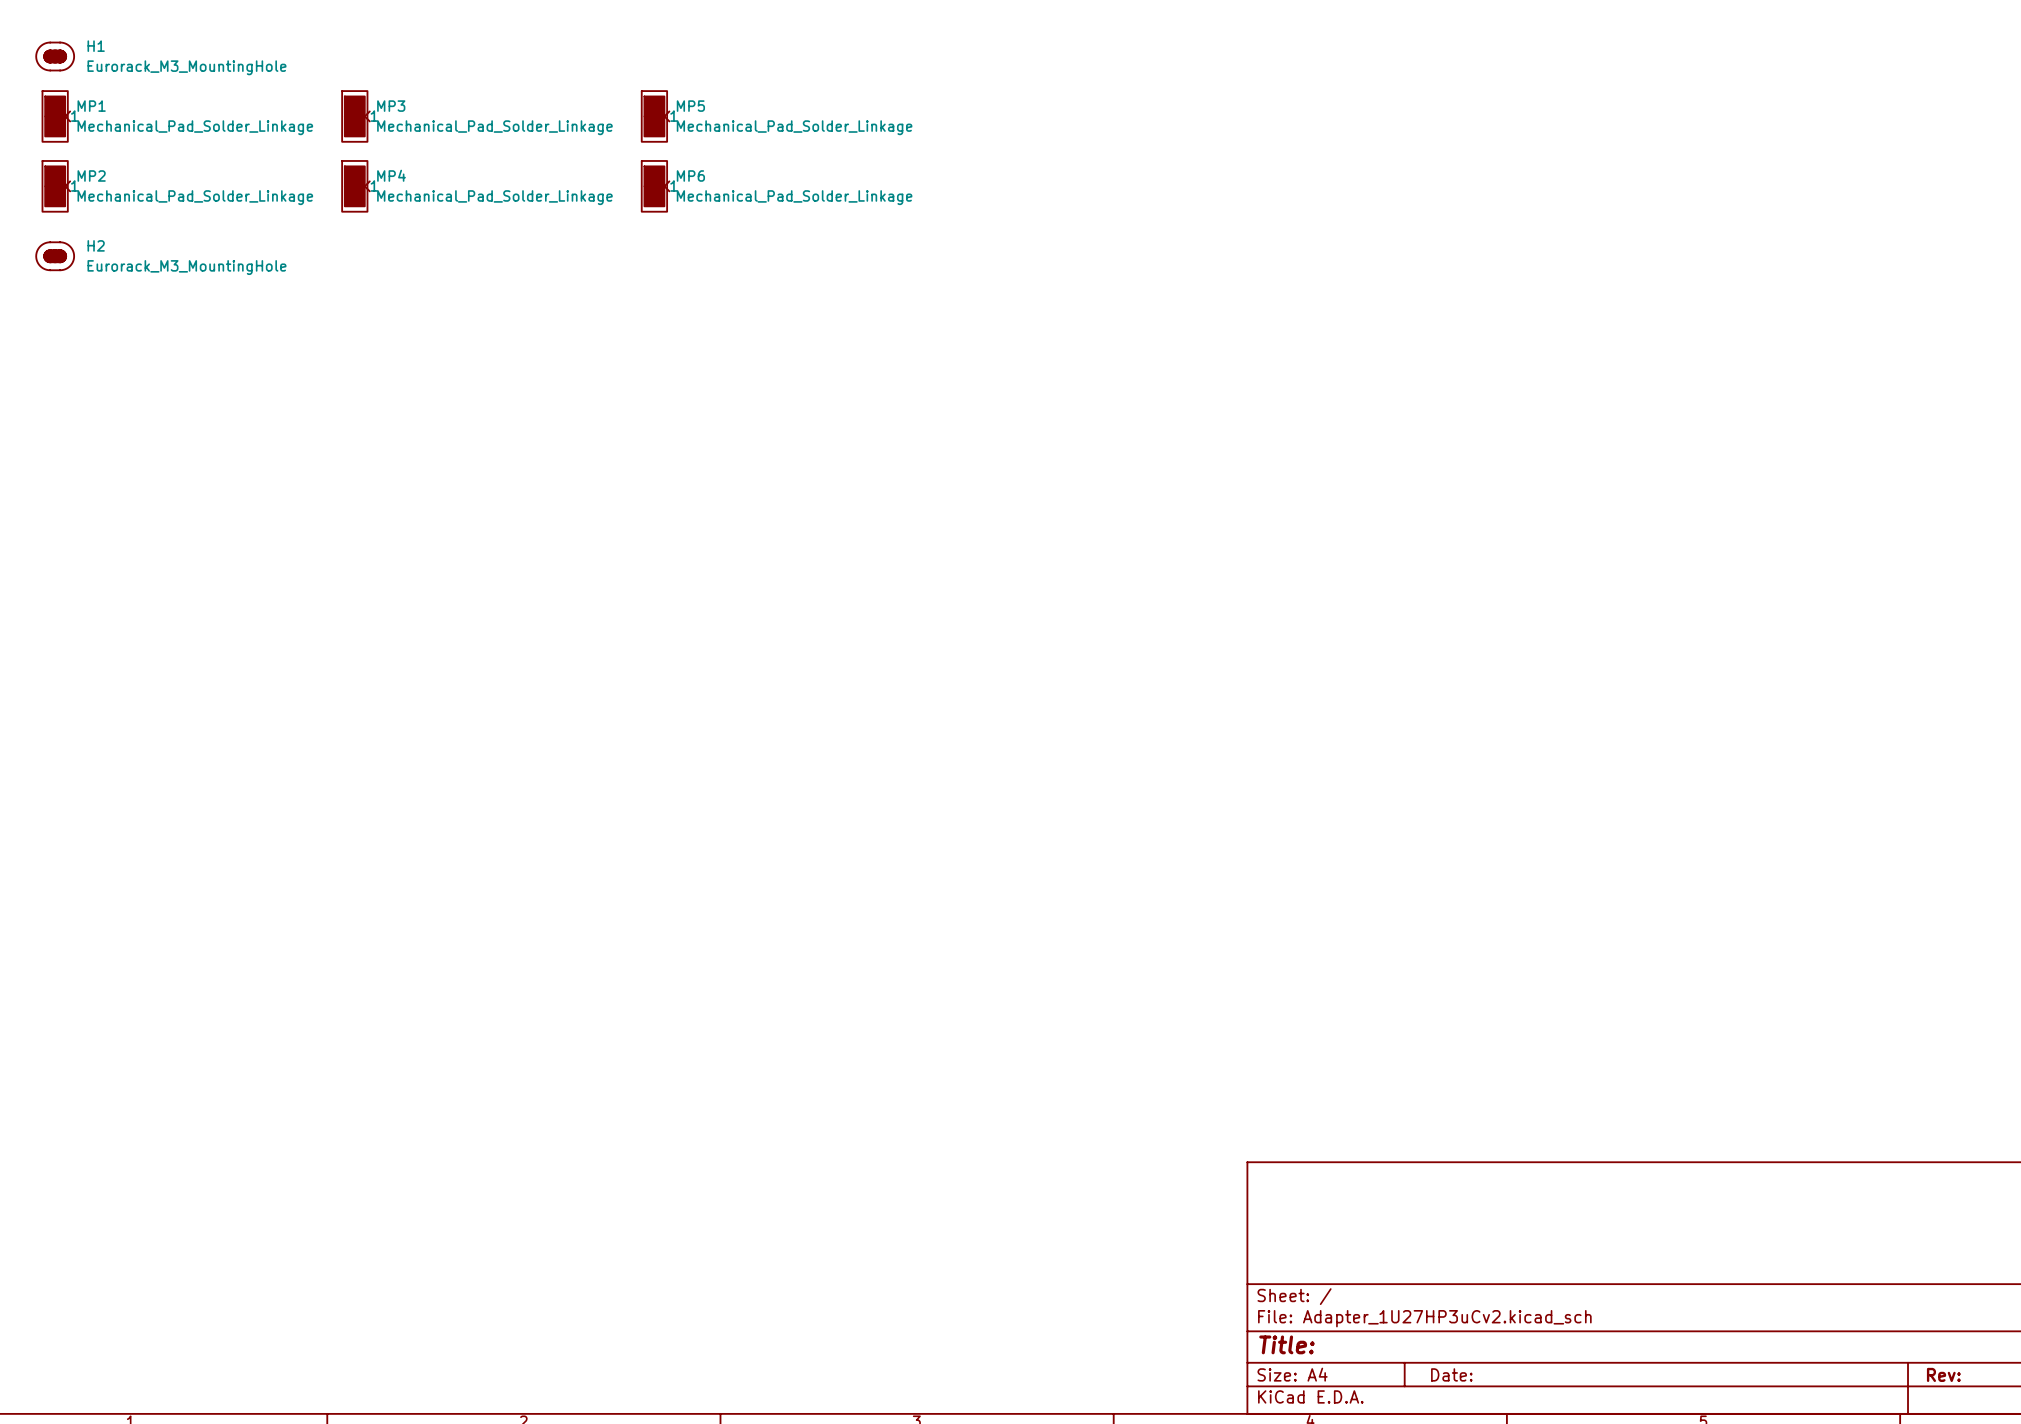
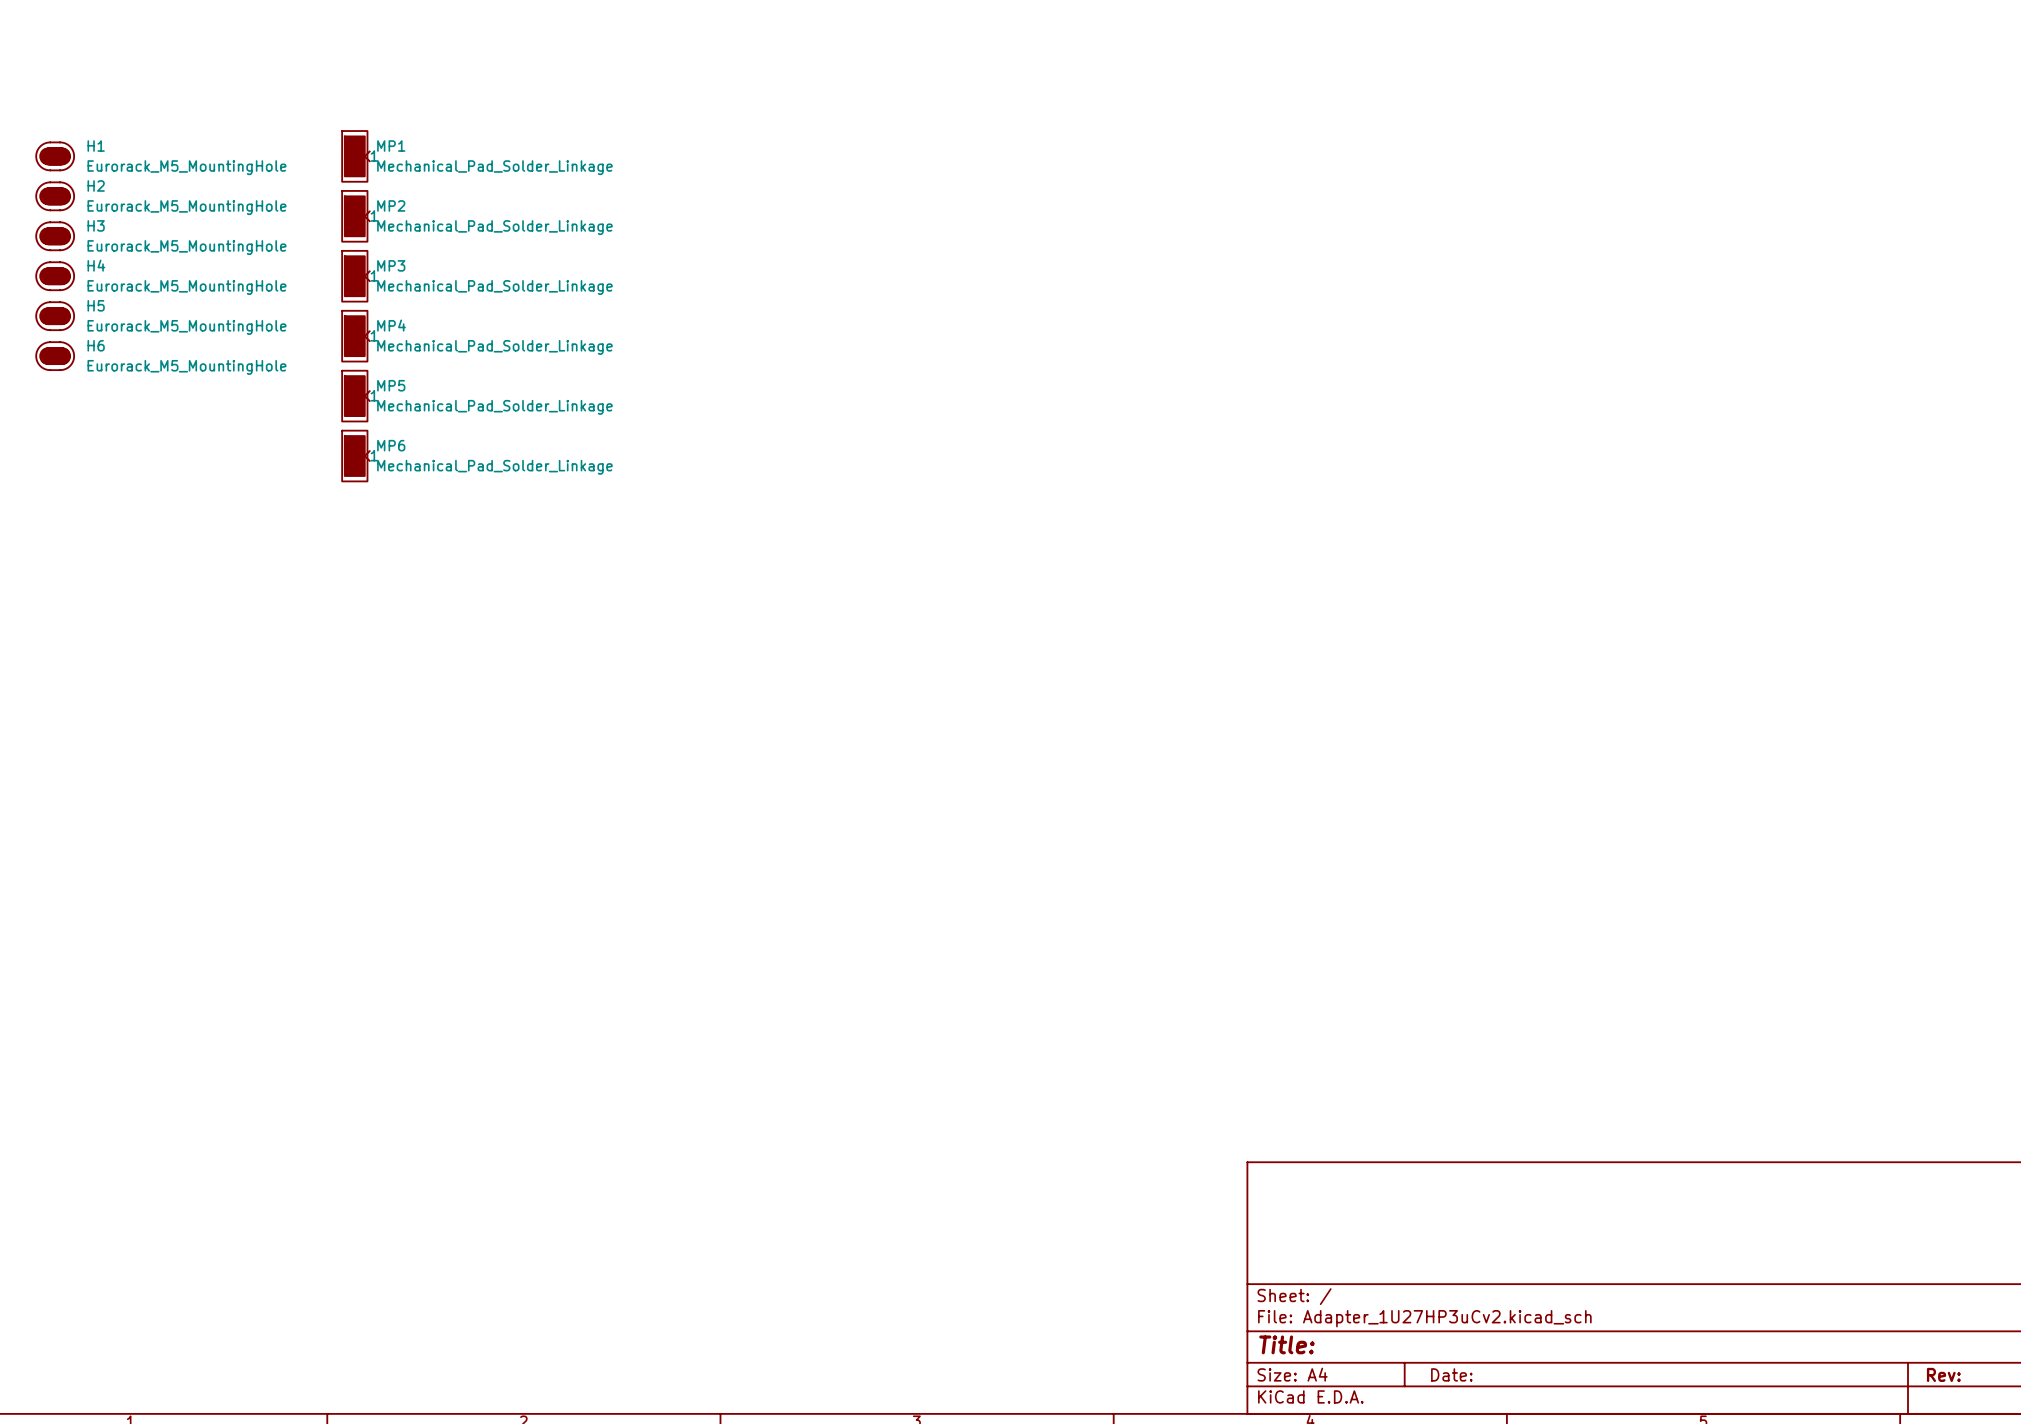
H1 symbol: [36, 42, 75, 71] -> [36, 142, 75, 171]
H1 value: Eurorack_M3_MountingHole (186, 67) -> Eurorack_M5_MountingHole (186, 167)
MP1 position: (56, 116) -> (355, 156)
MP3 position: (355, 116) -> (355, 276)
MP5 position: (655, 116) -> (355, 396)
MP2 position: (56, 186) -> (355, 216)
MP4 position: (355, 186) -> (355, 336)
MP6 position: (655, 186) -> (355, 456)
H3: none -> Eurorack_M5_MountingHole (55, 236)
H2 symbol: [36, 242, 75, 271] -> [36, 182, 75, 211]
H2 value: Eurorack_M3_MountingHole (186, 267) -> Eurorack_M5_MountingHole (186, 207)
H4: none -> Eurorack_M5_MountingHole (55, 276)
H5: none -> Eurorack_M5_MountingHole (55, 316)
H6: none -> Eurorack_M5_MountingHole (55, 356)

